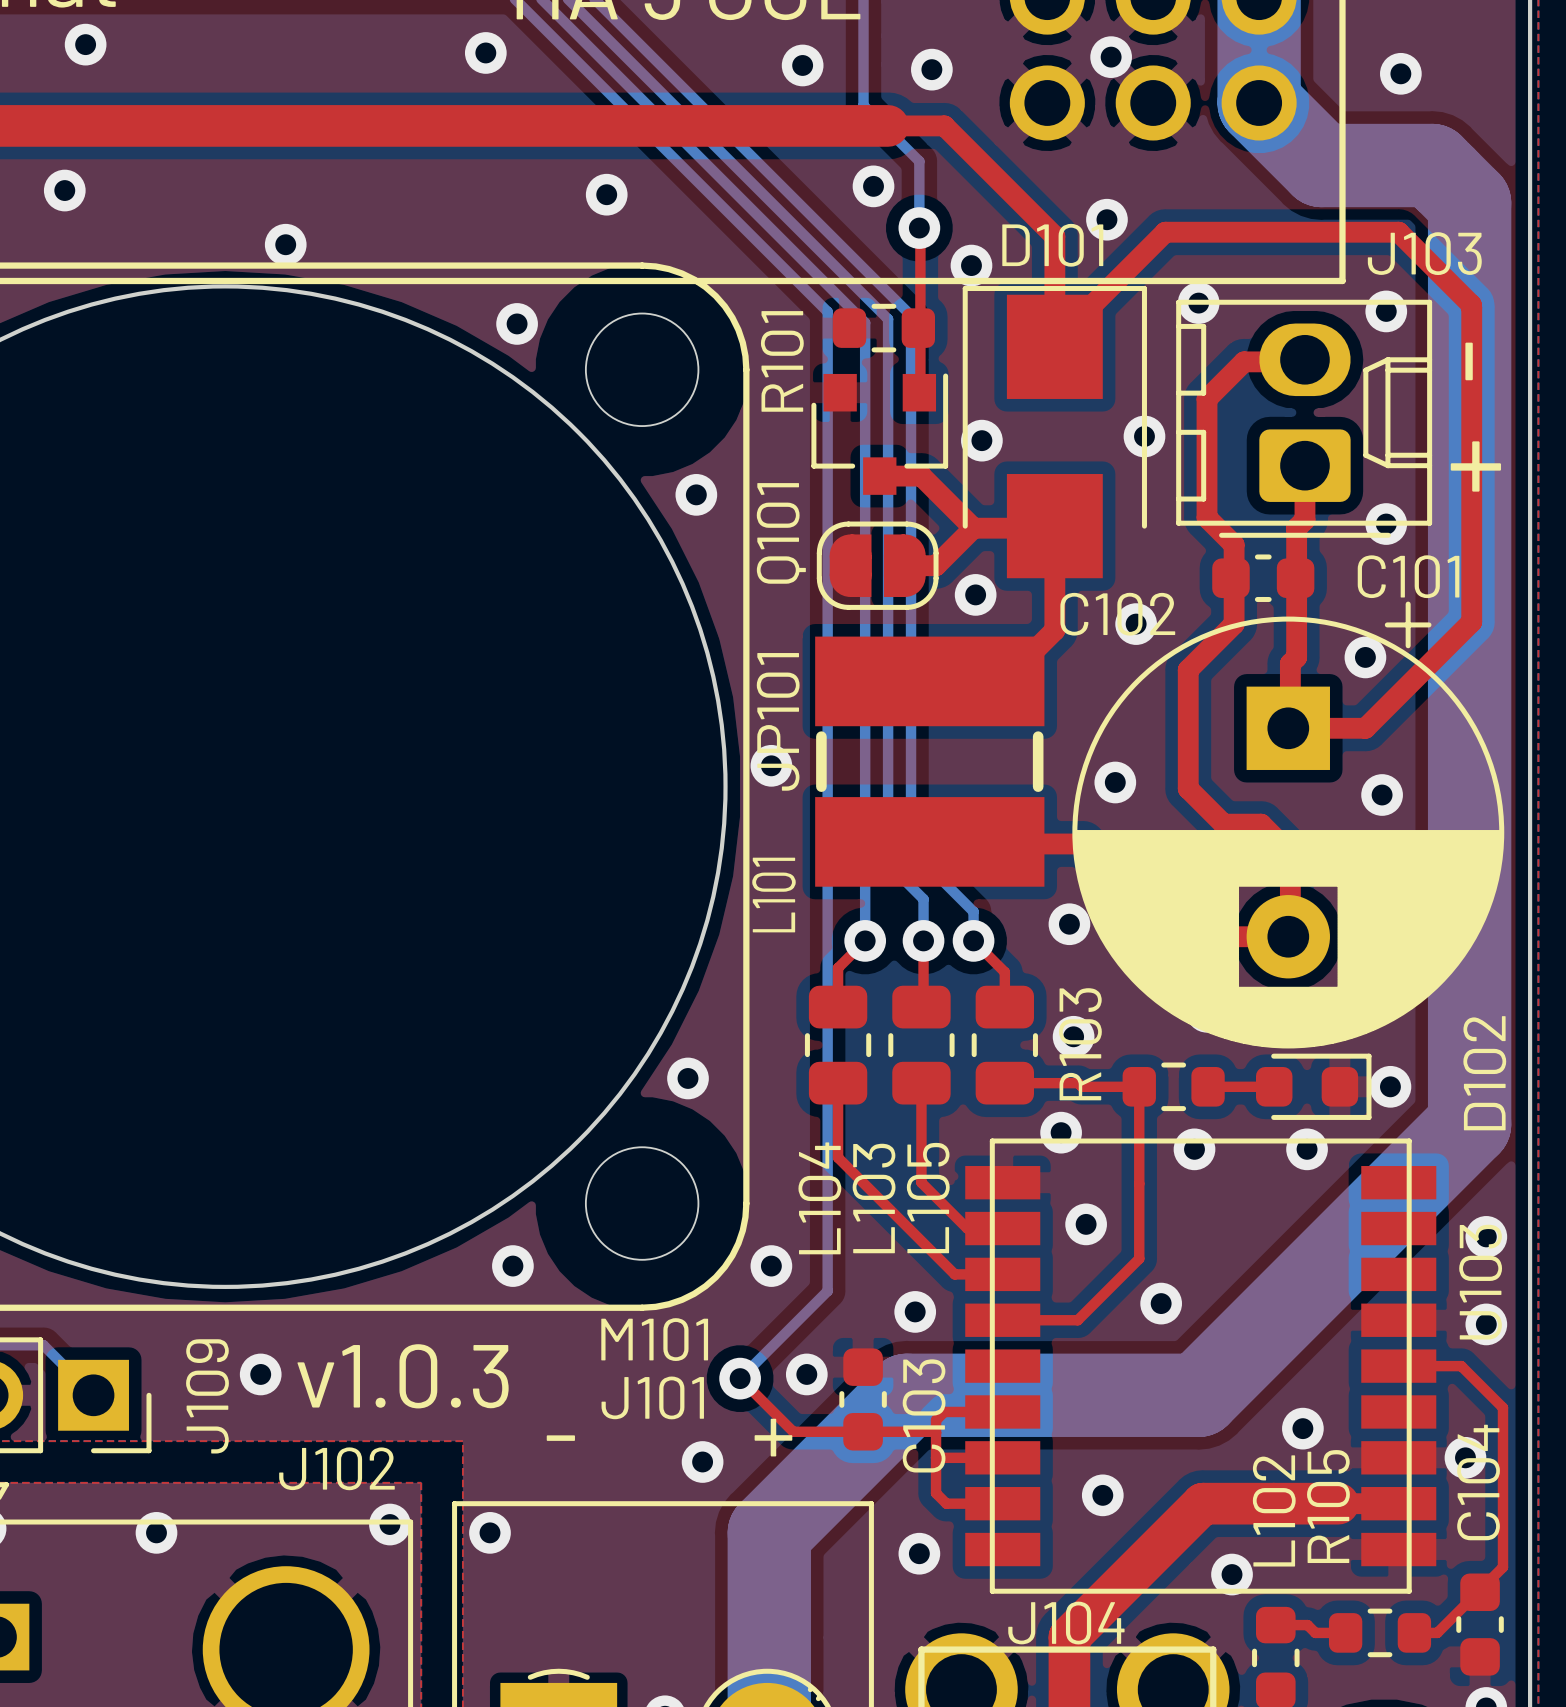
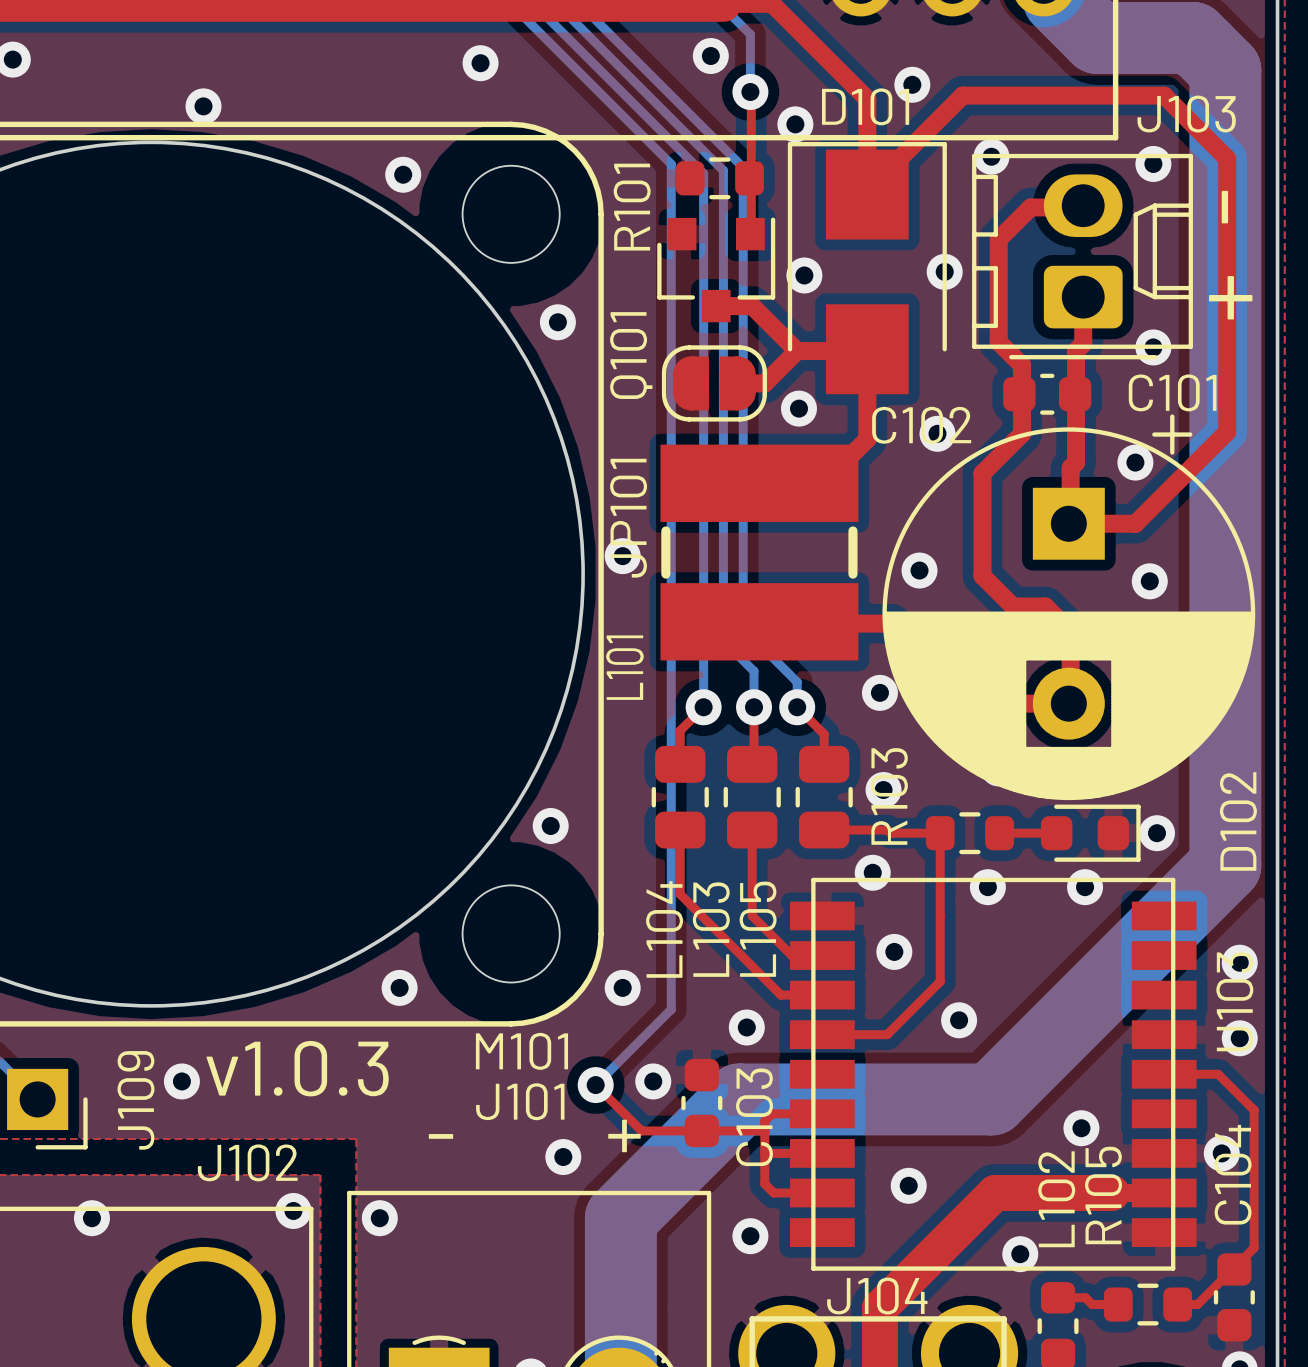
text position: v1.0.3 (403, 1376) -> v1.0.3 (297, 1068)

